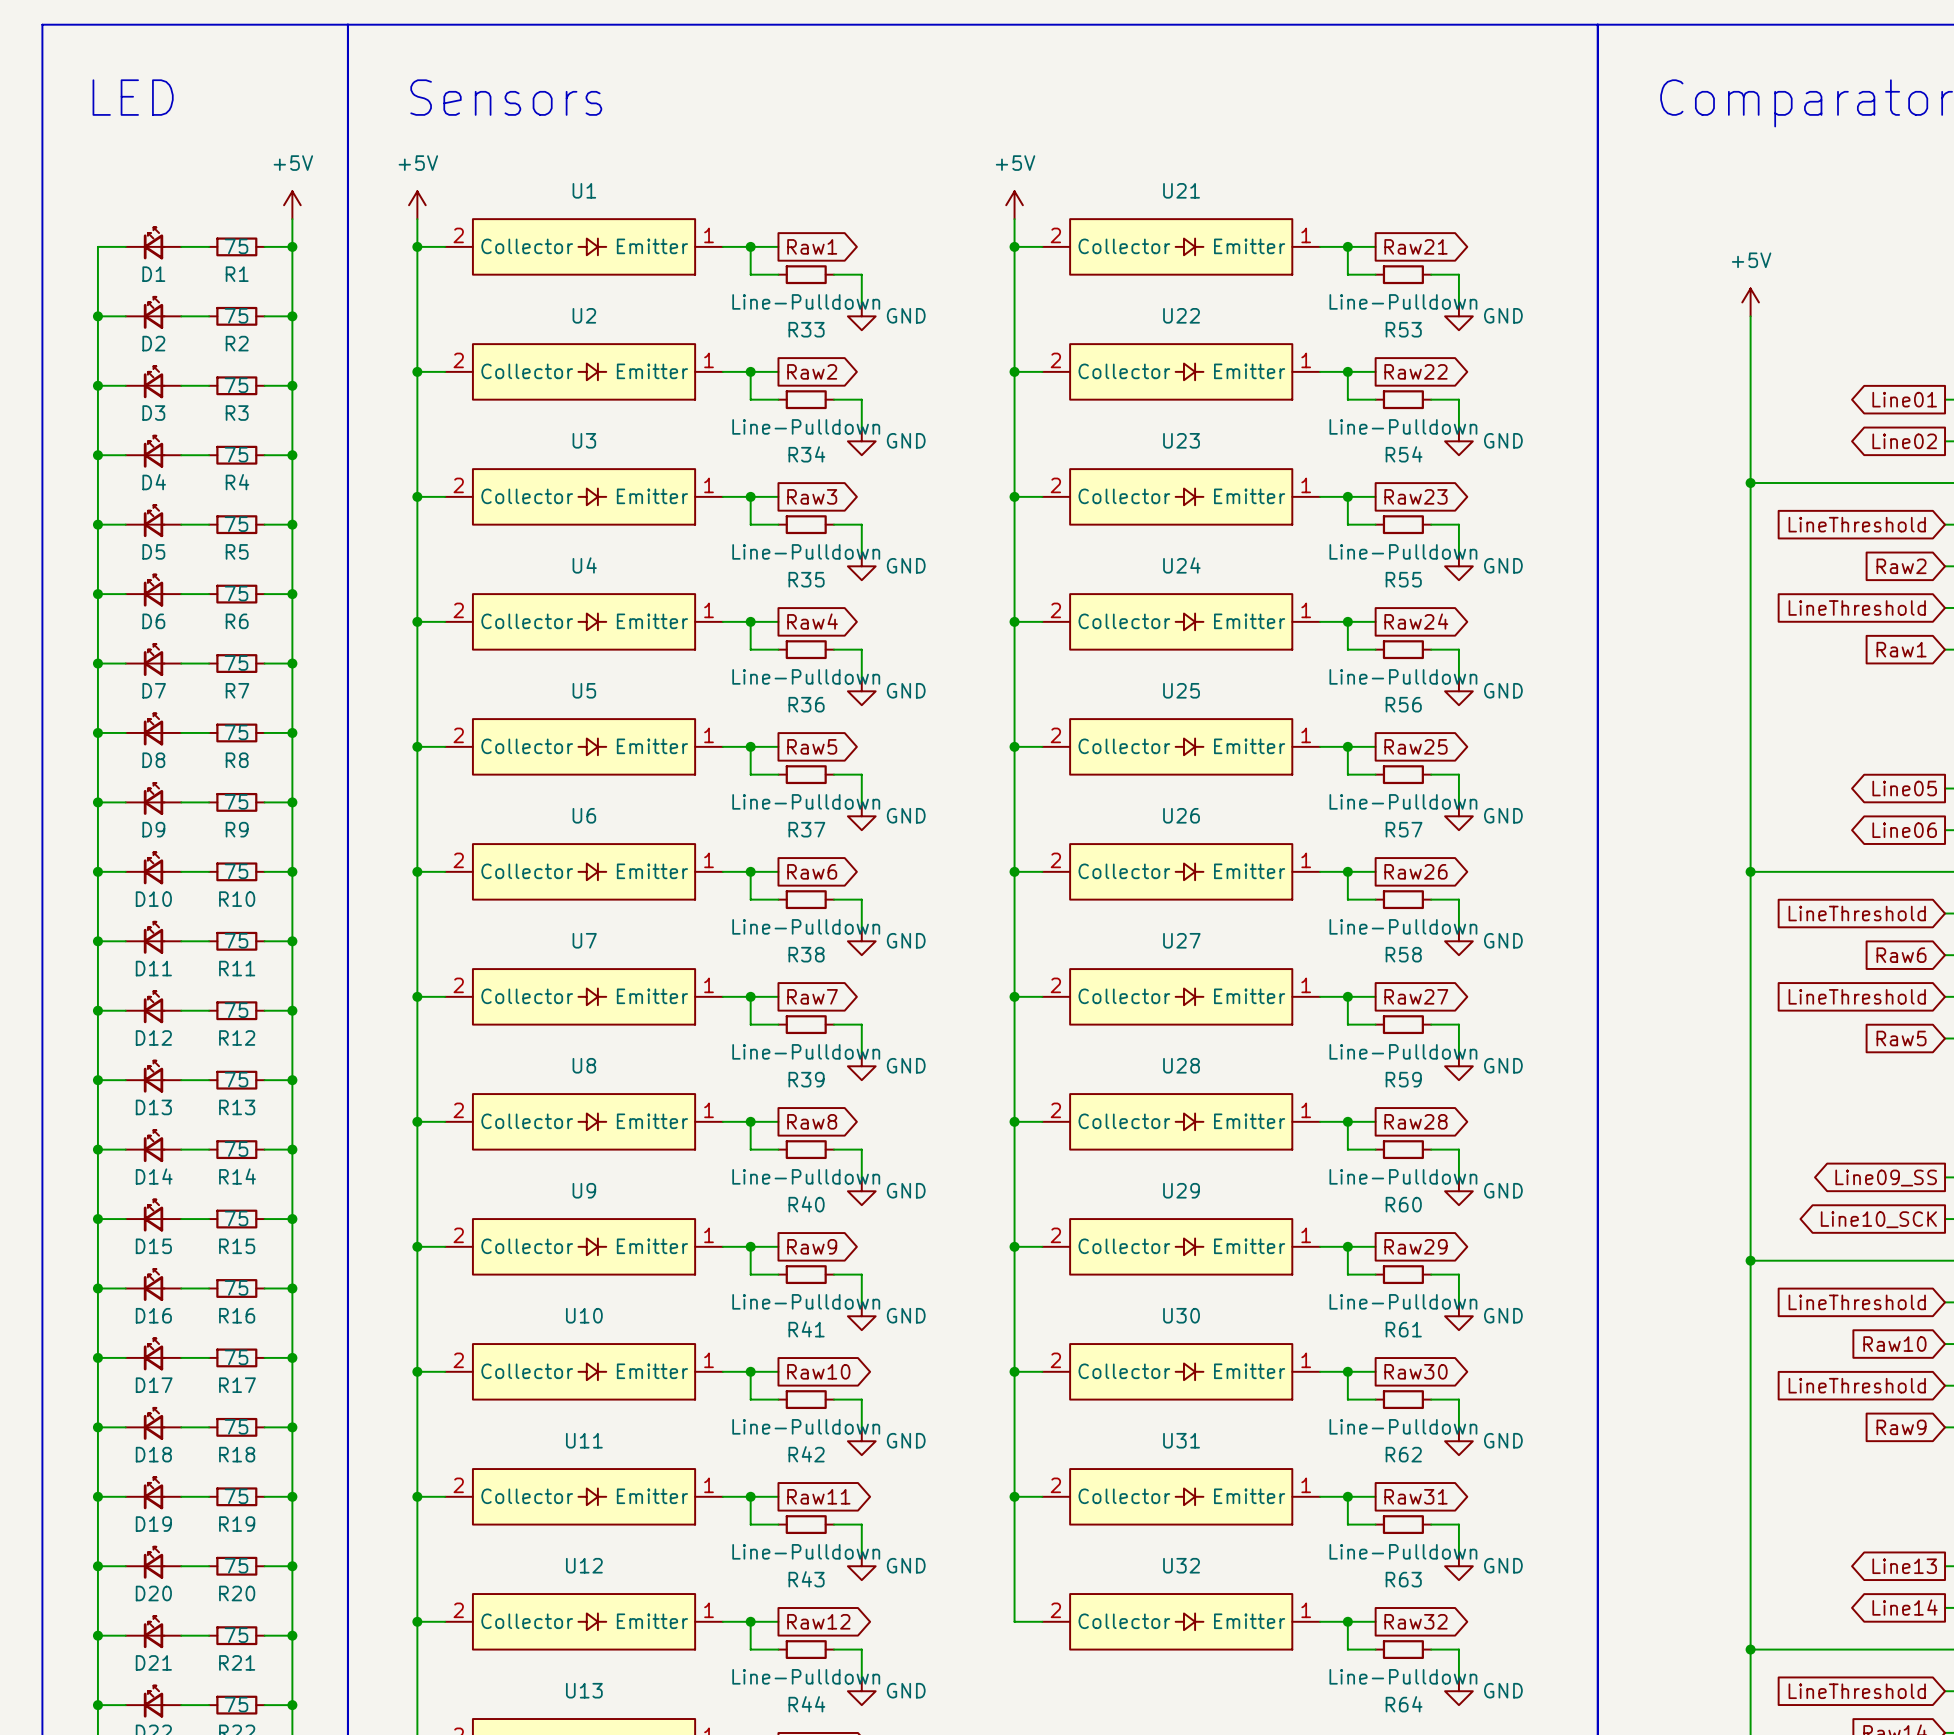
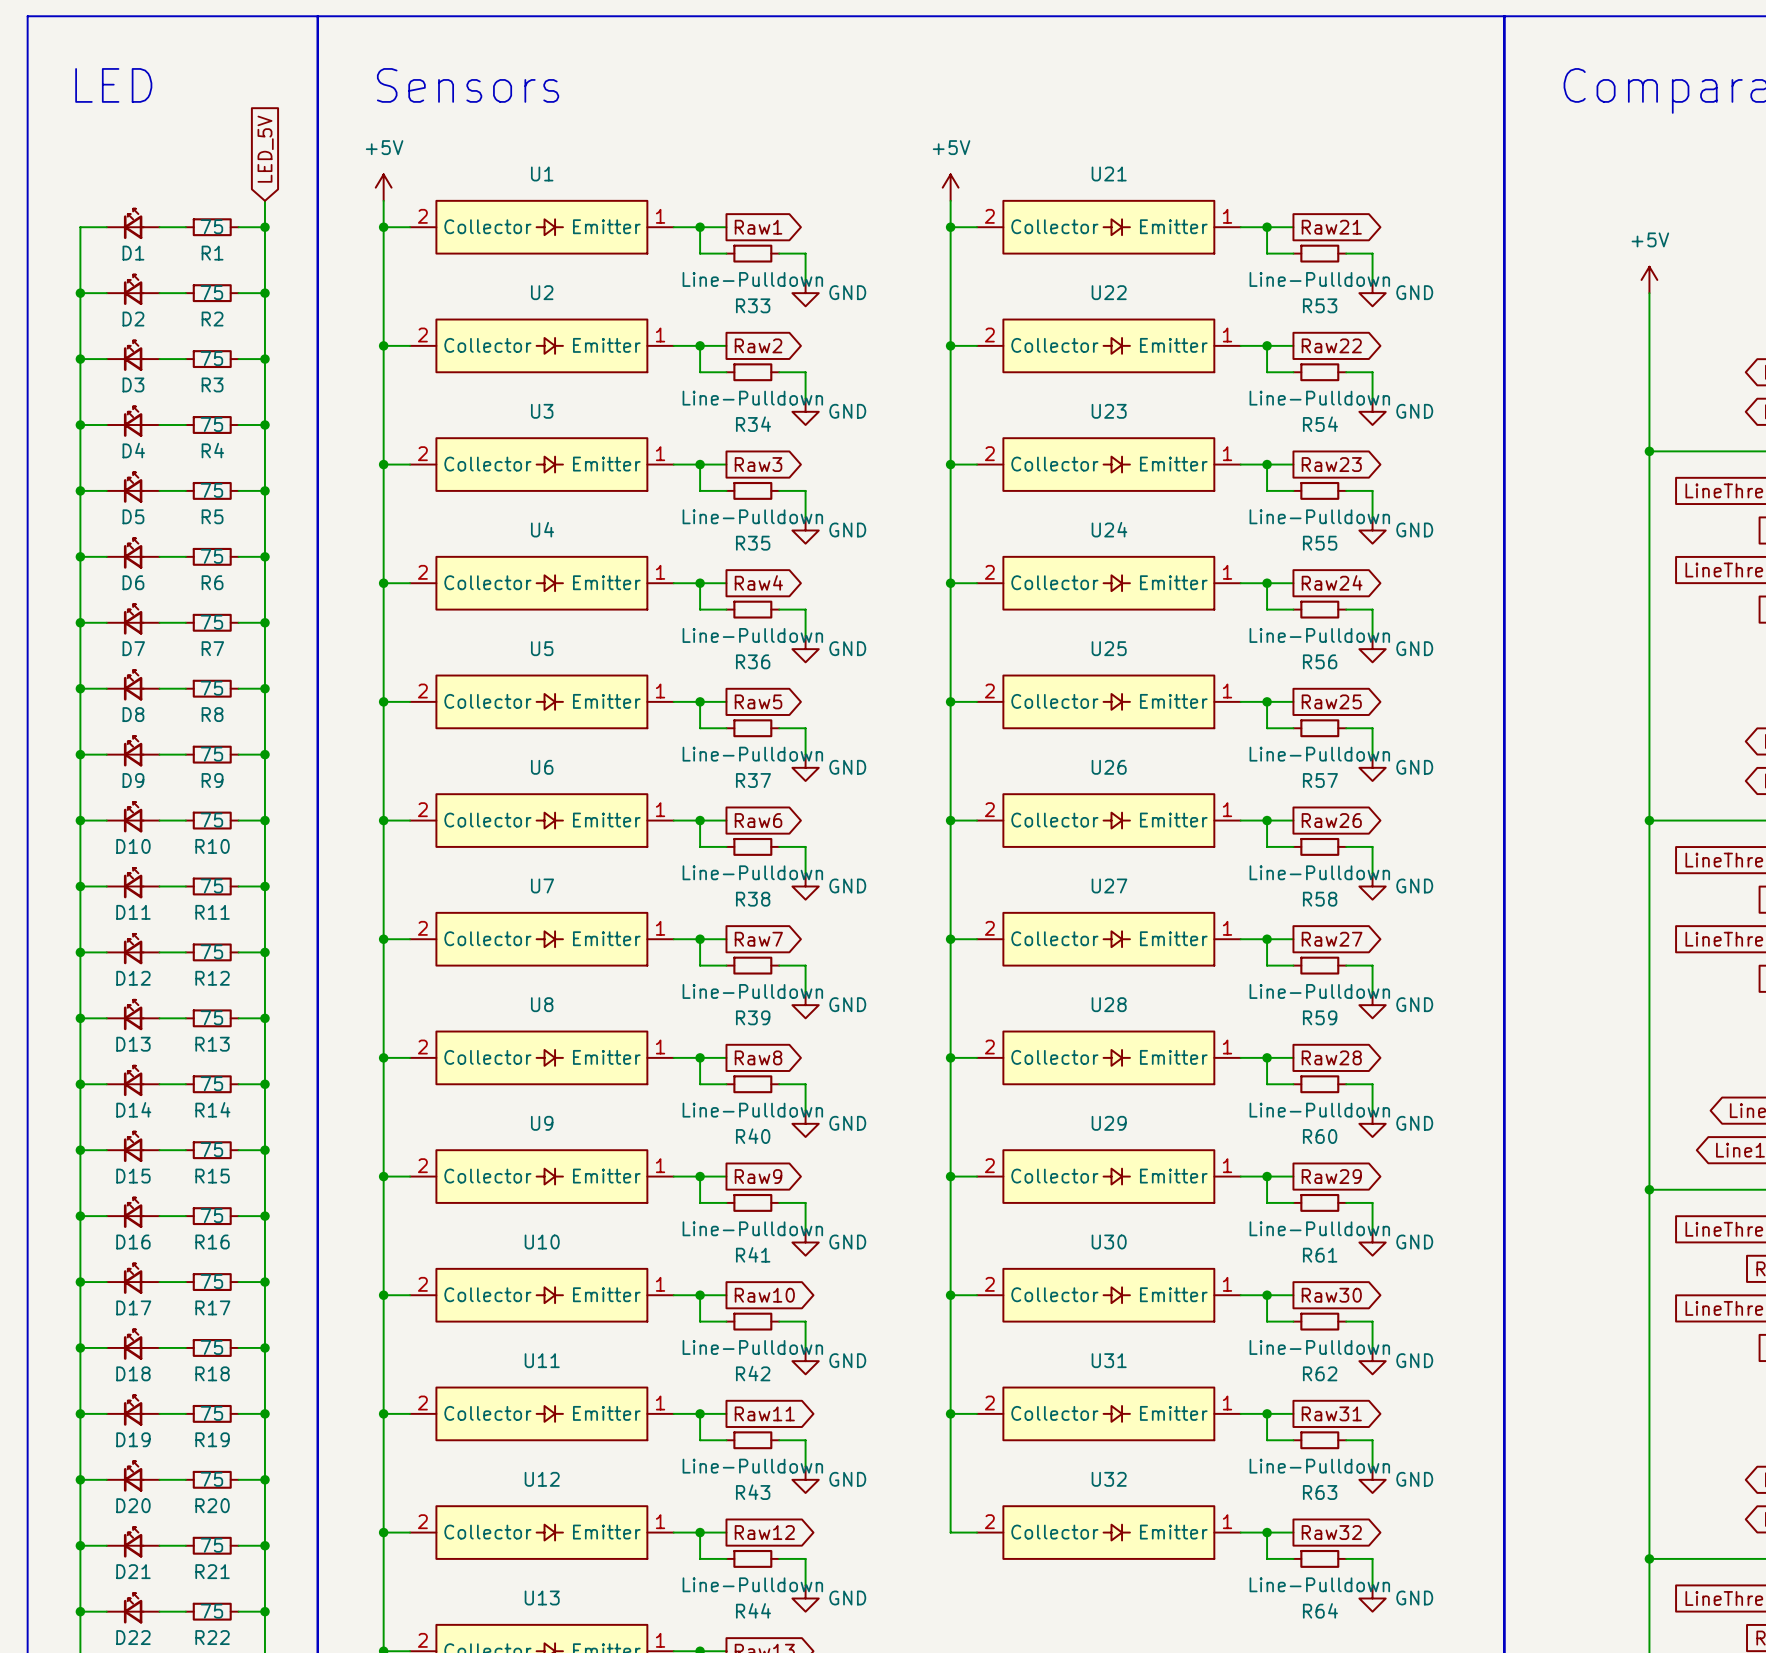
global label: none -> LED_5V (265, 149)
power symbol: +5V (292, 205) -> none

